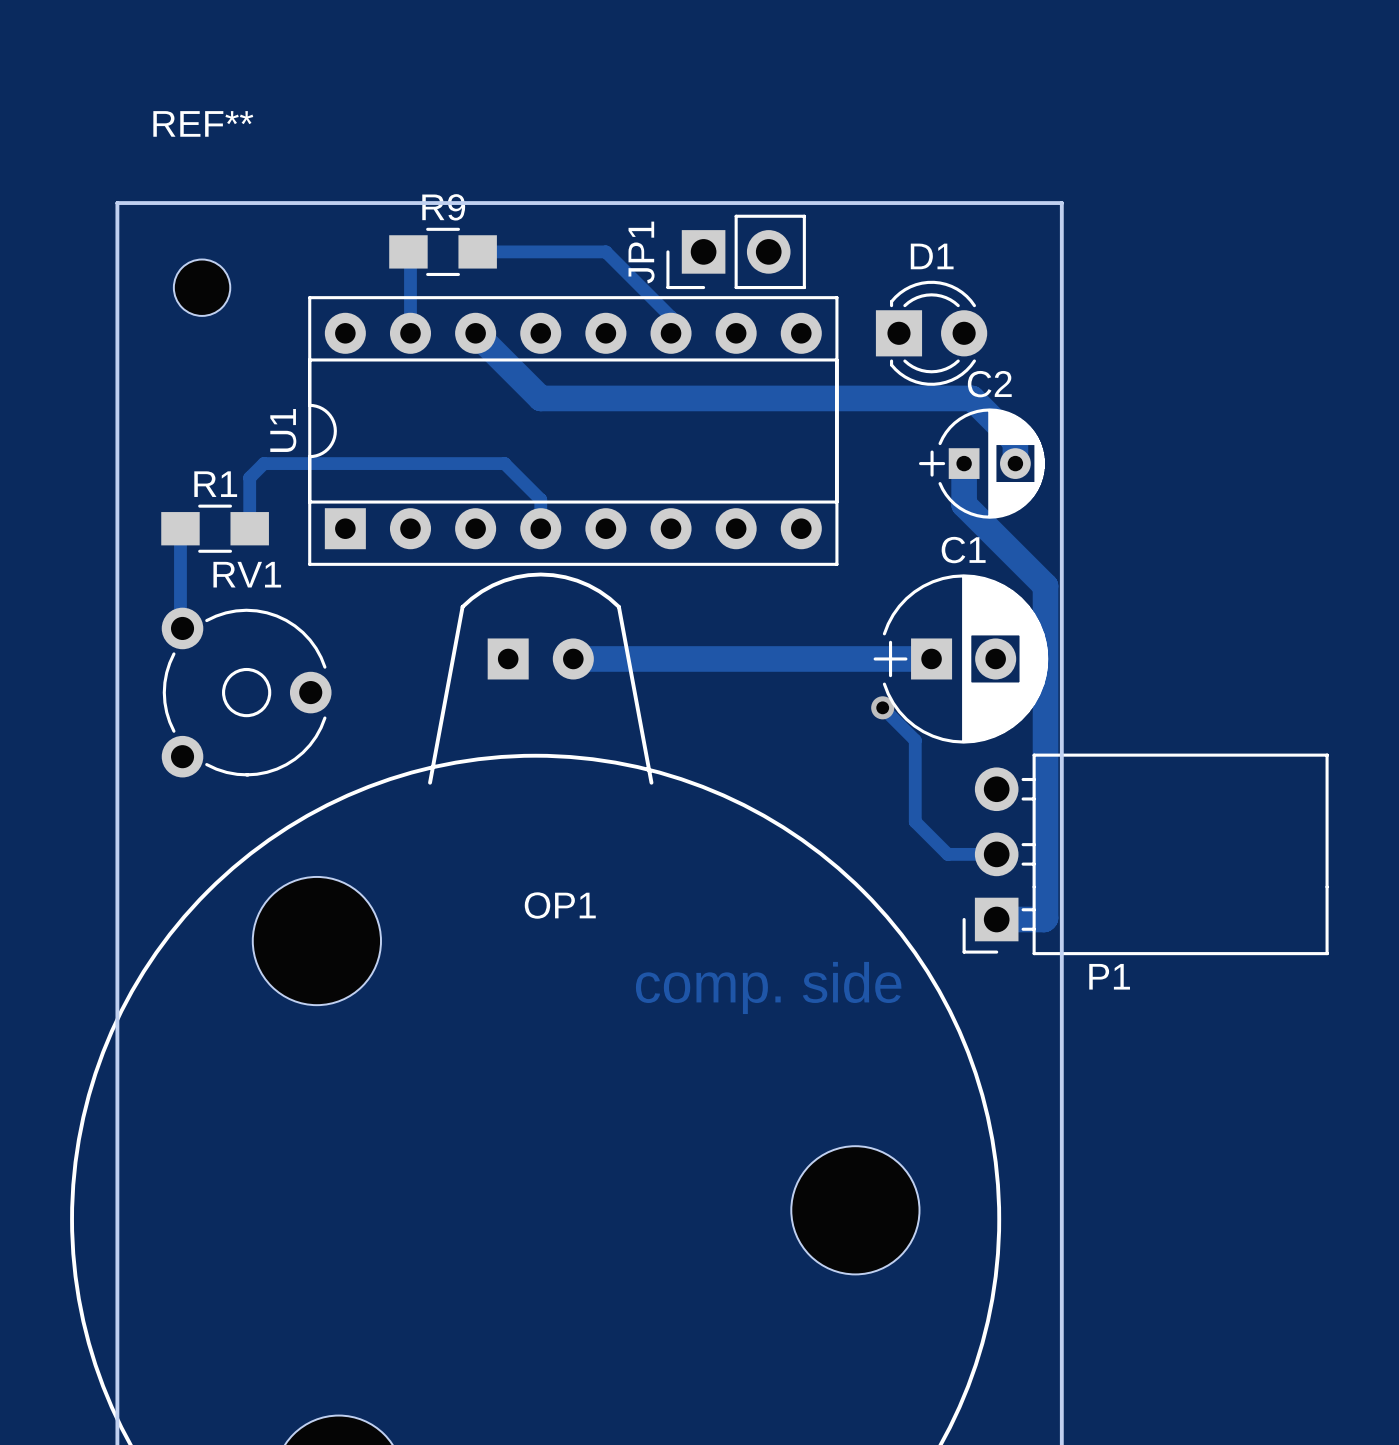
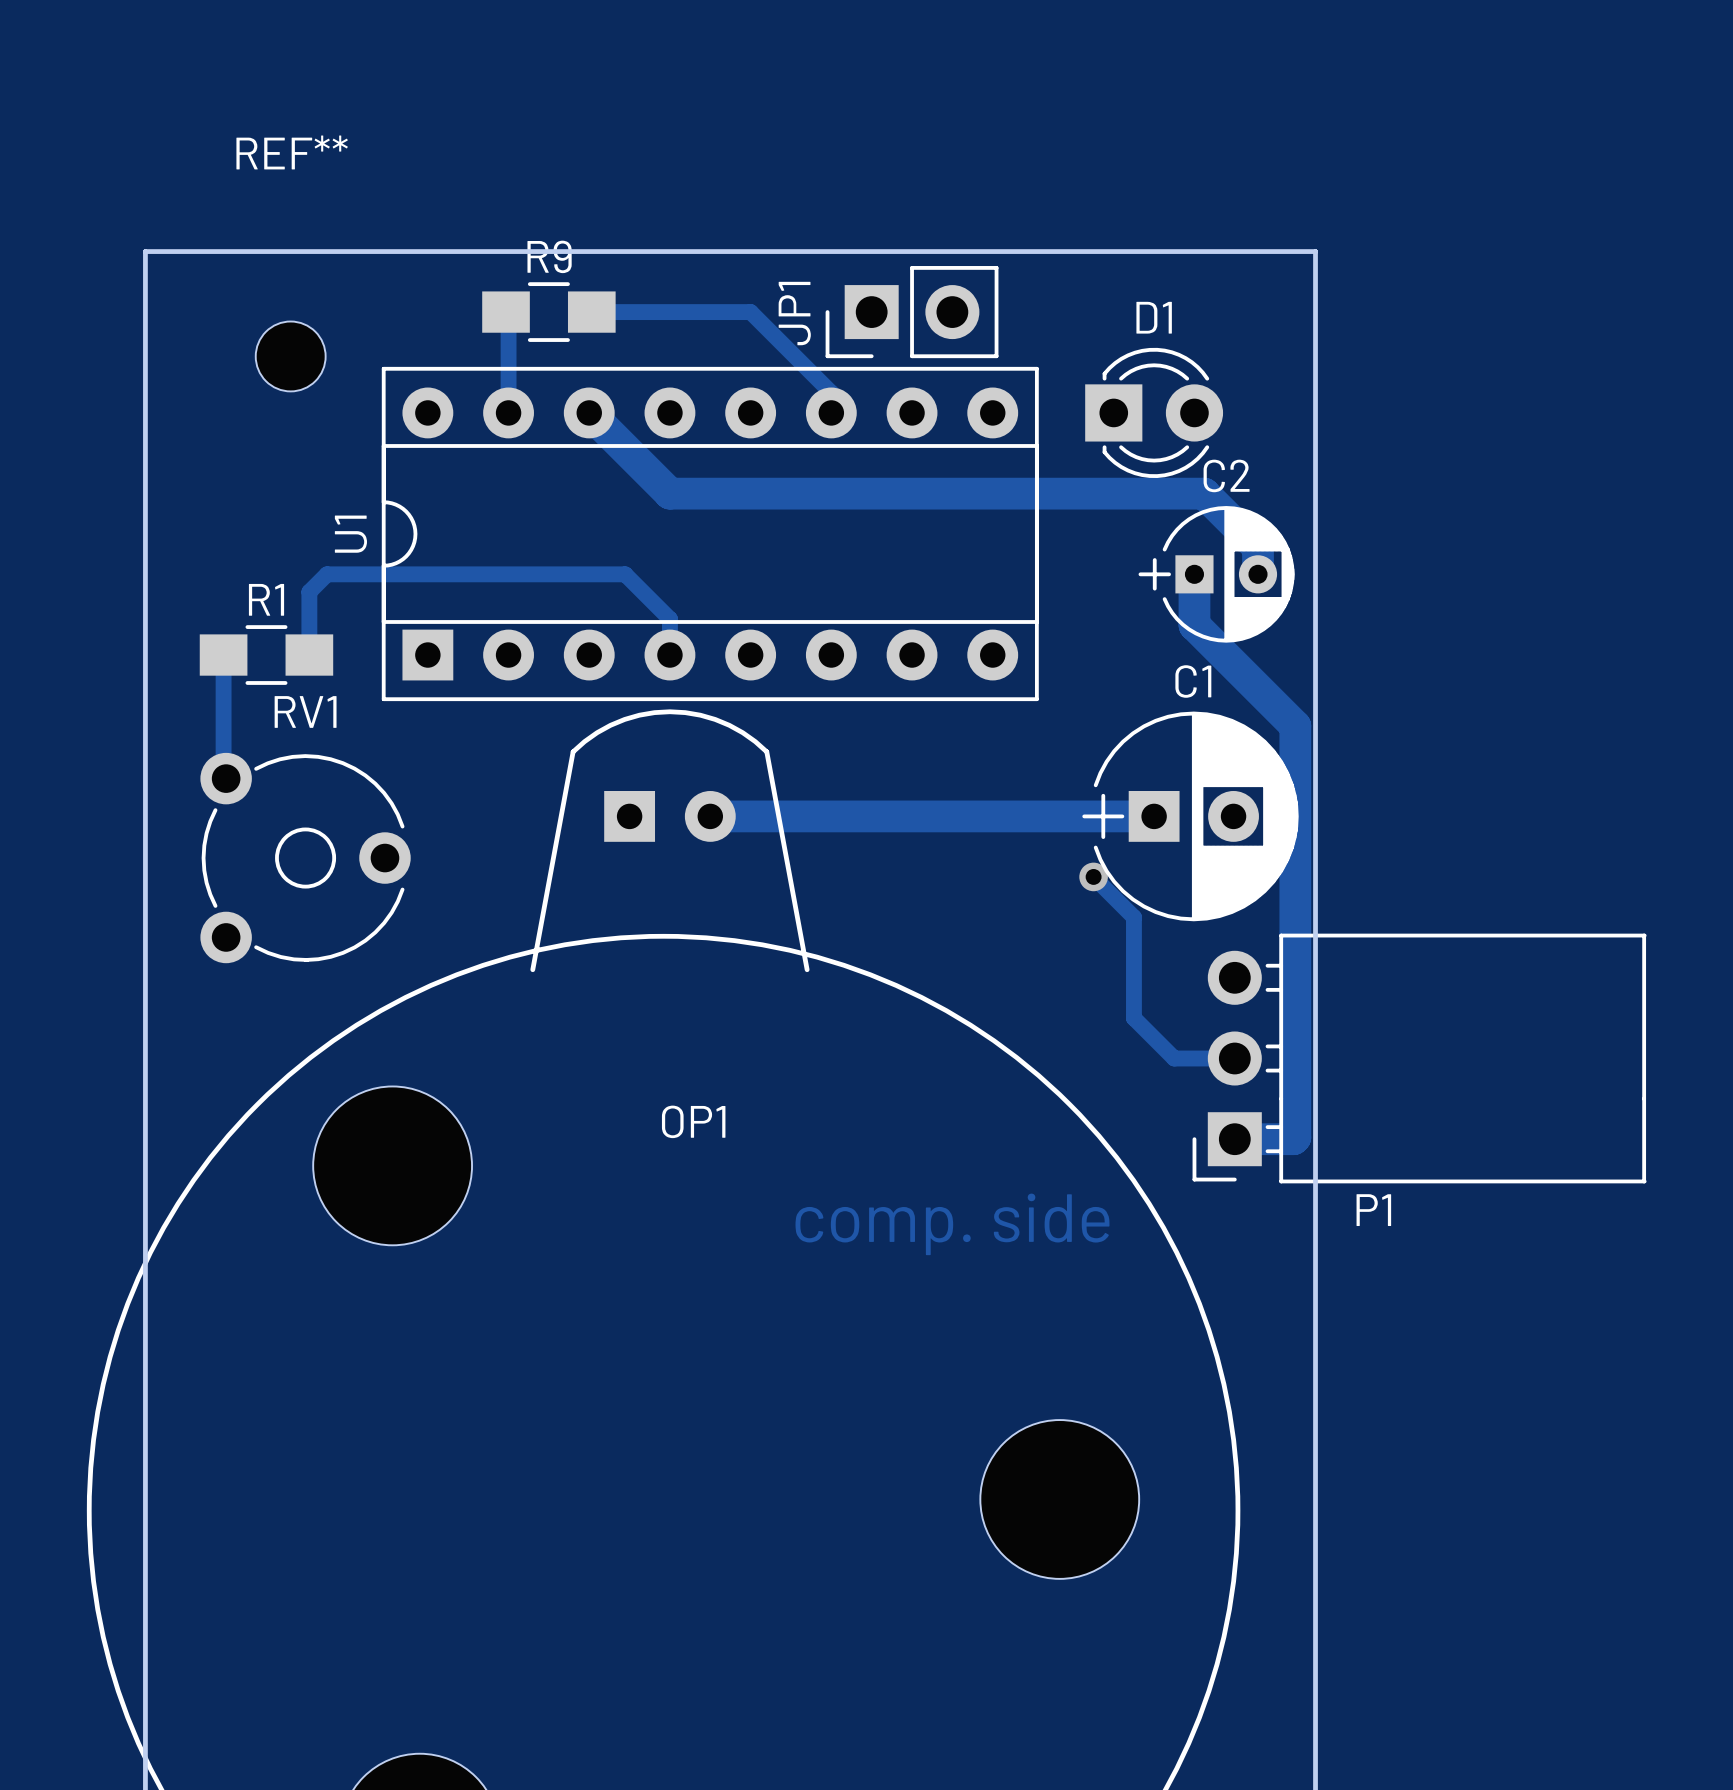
REF** position: (202, 287) -> (290, 356)

